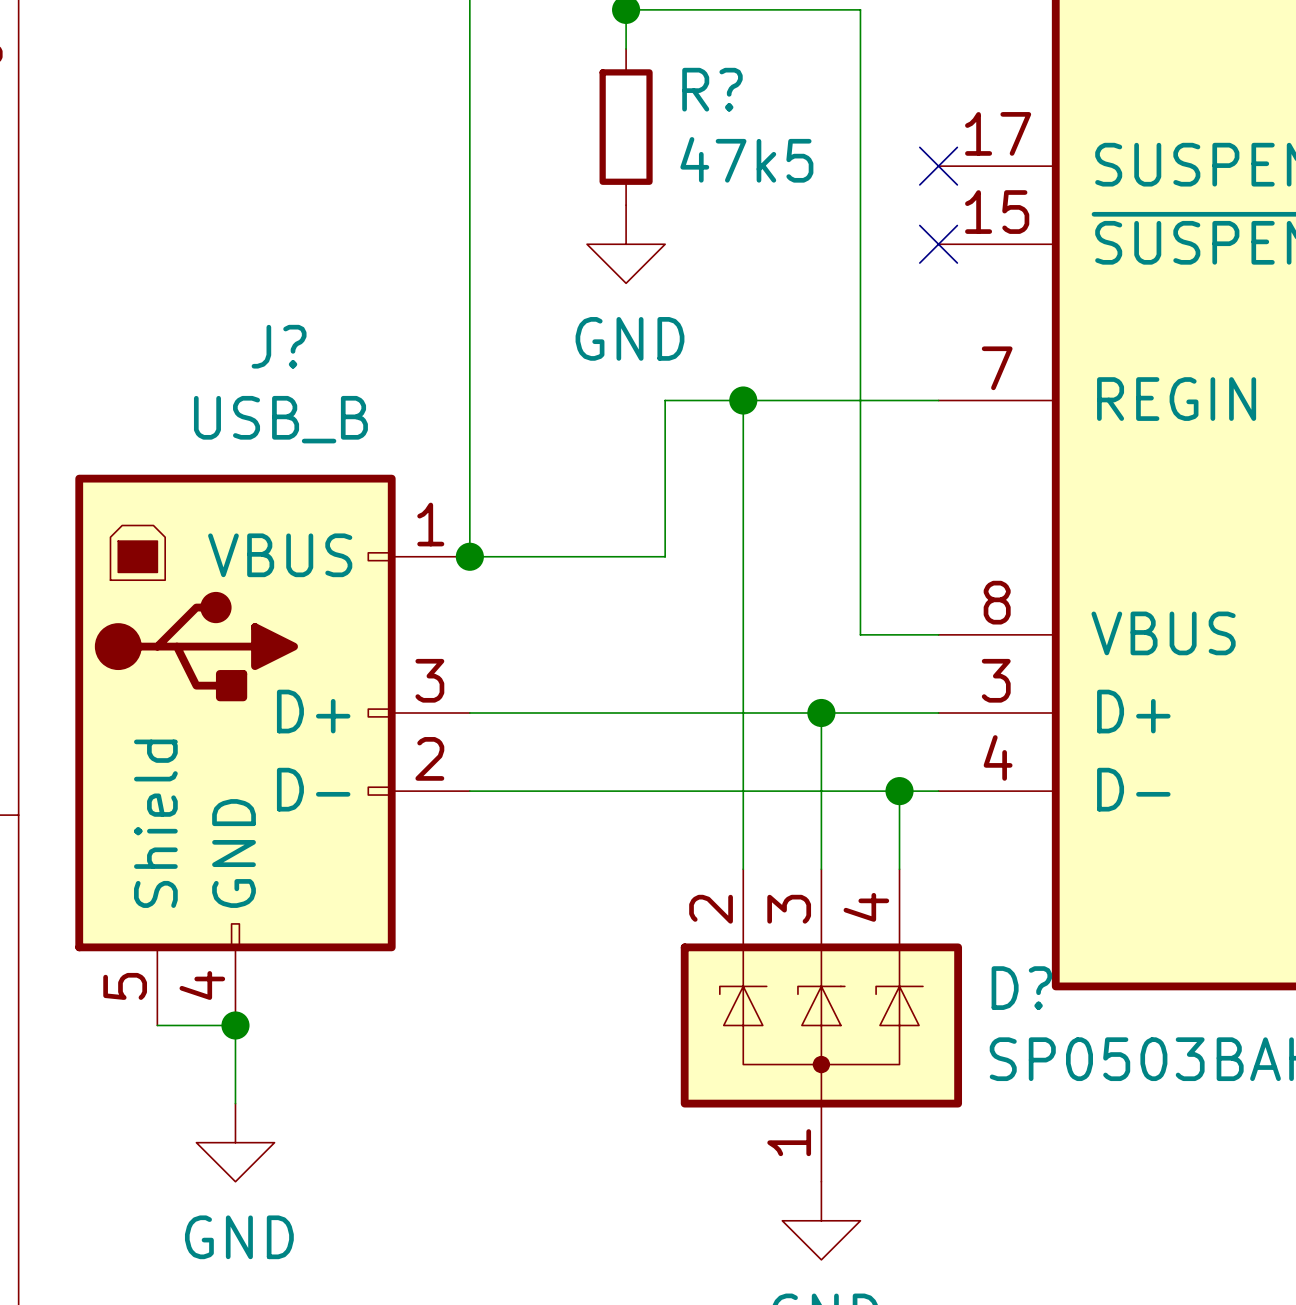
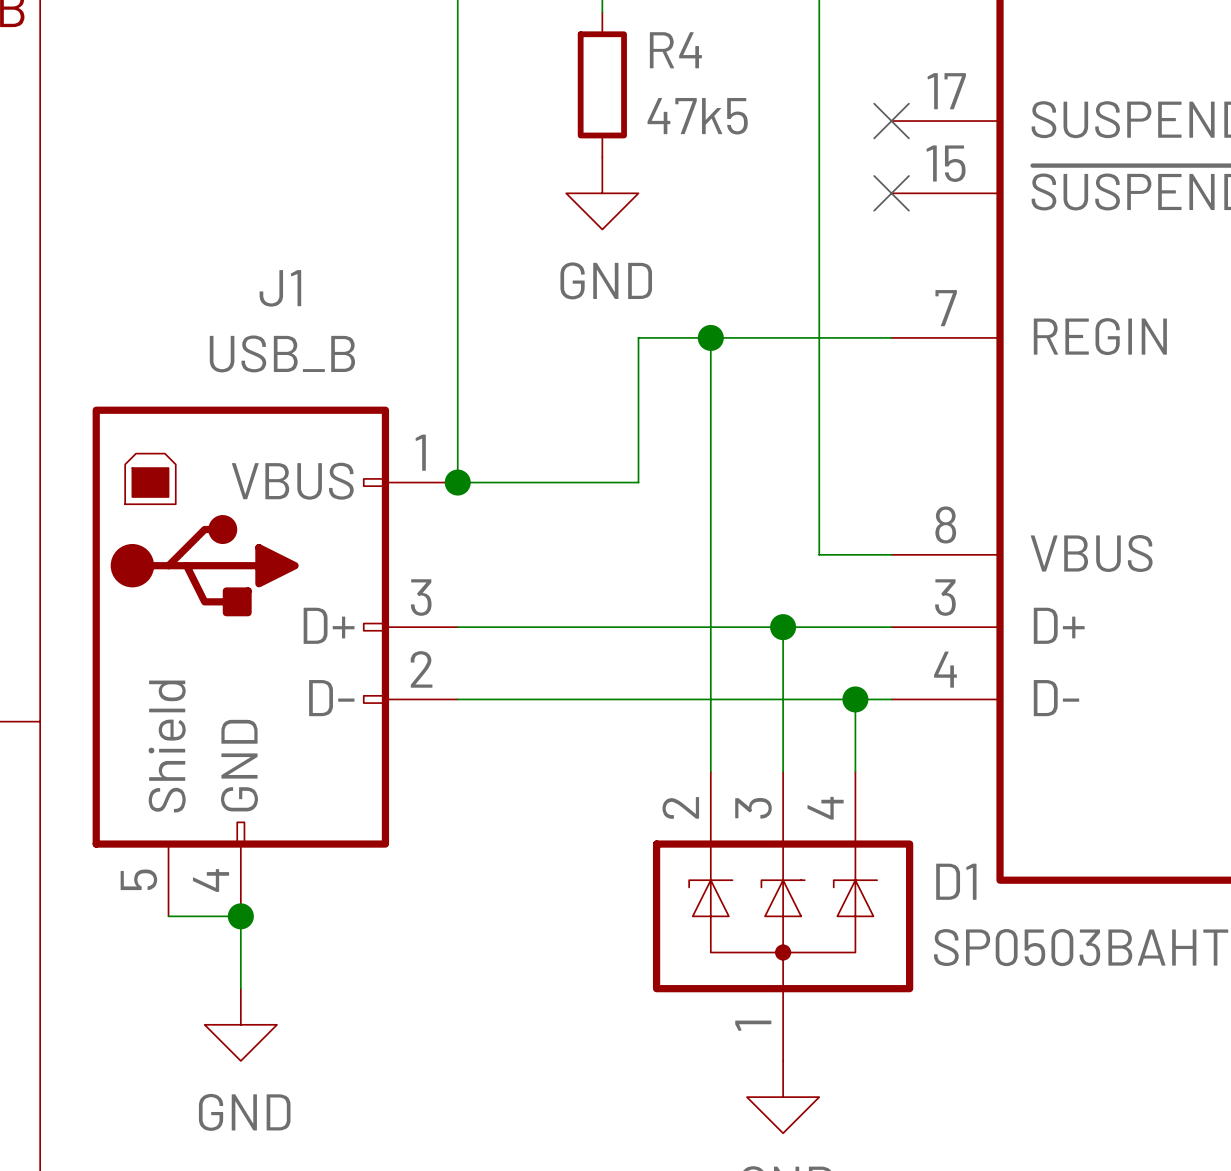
R? name: R? (712, 89) -> R4 (675, 50)
J? name: J? (279, 346) -> J1 (280, 288)
D? name: D? (1021, 988) -> D1 (956, 881)

